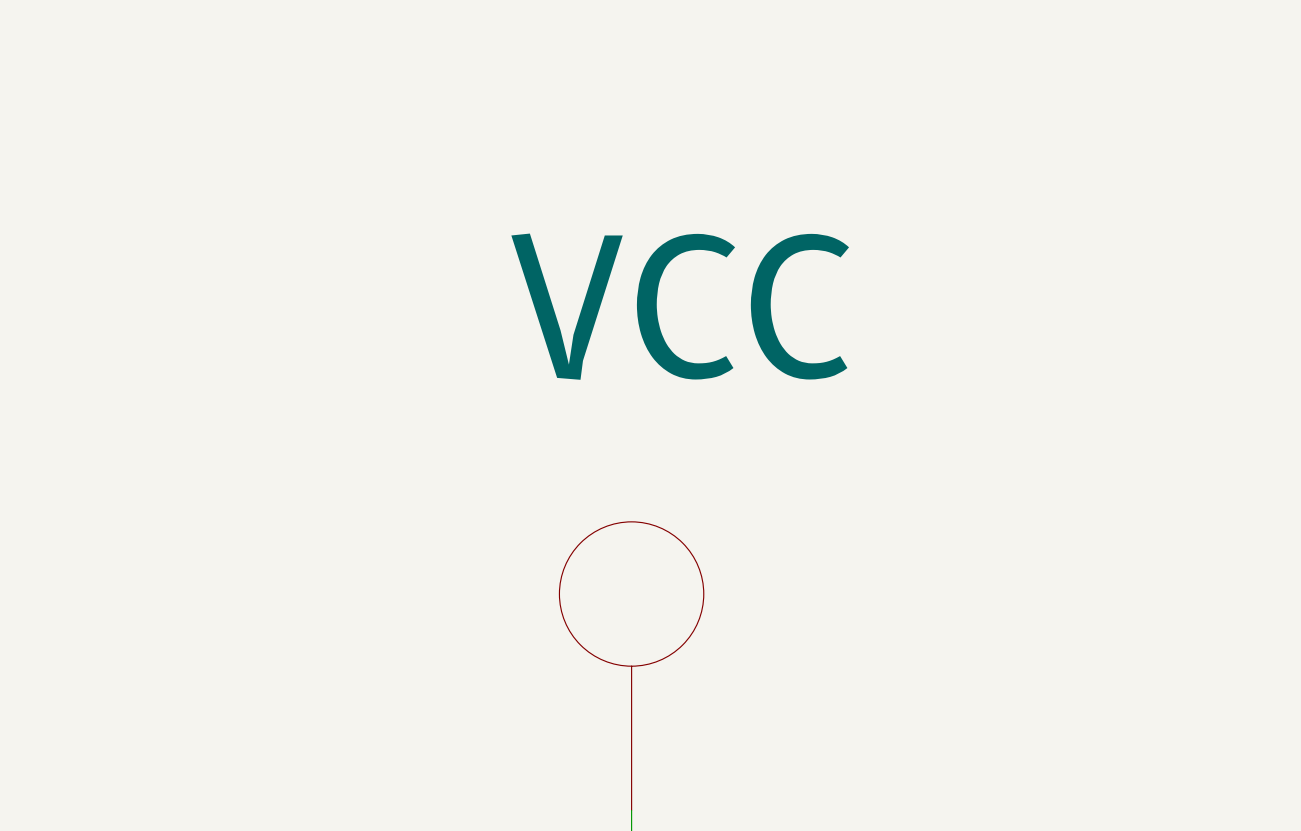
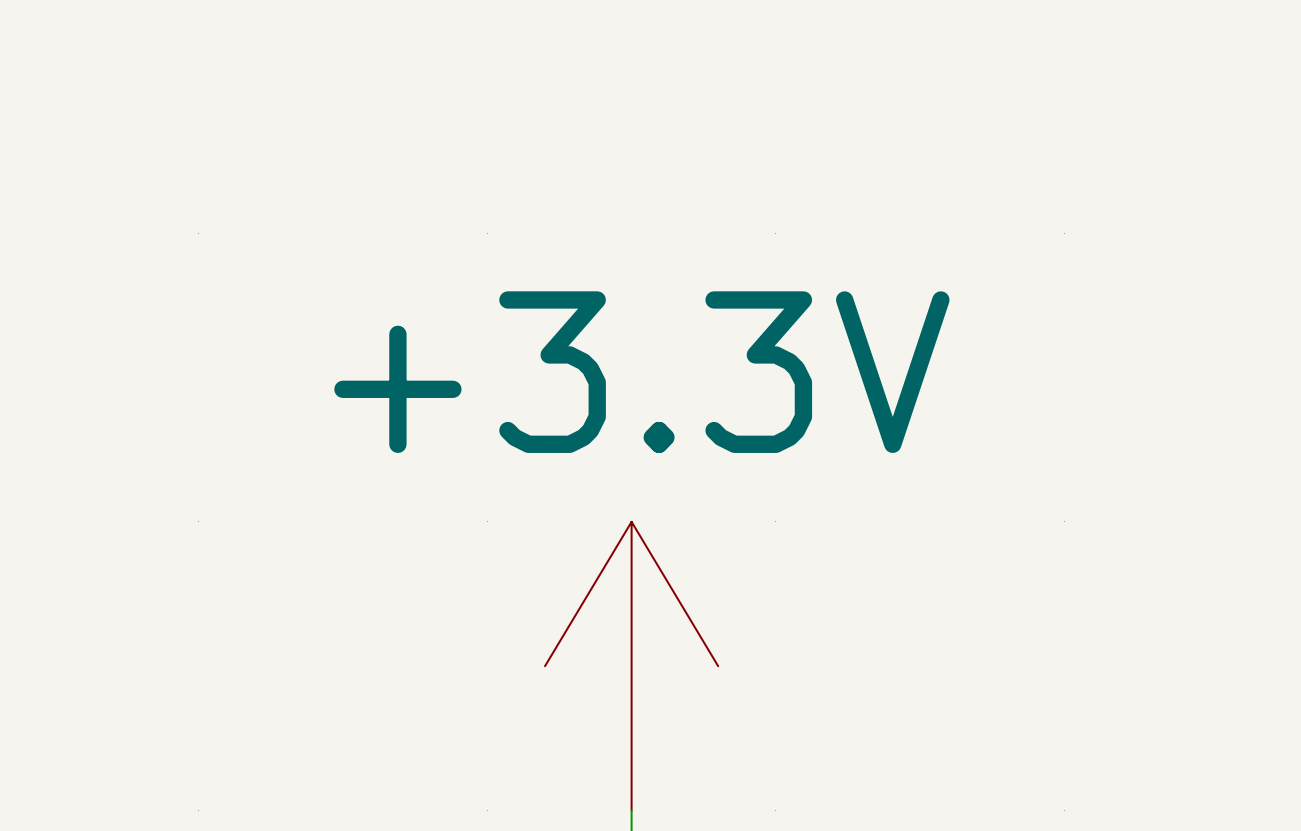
power symbol: VCC (631, 666) -> +3.3V (631, 666)

